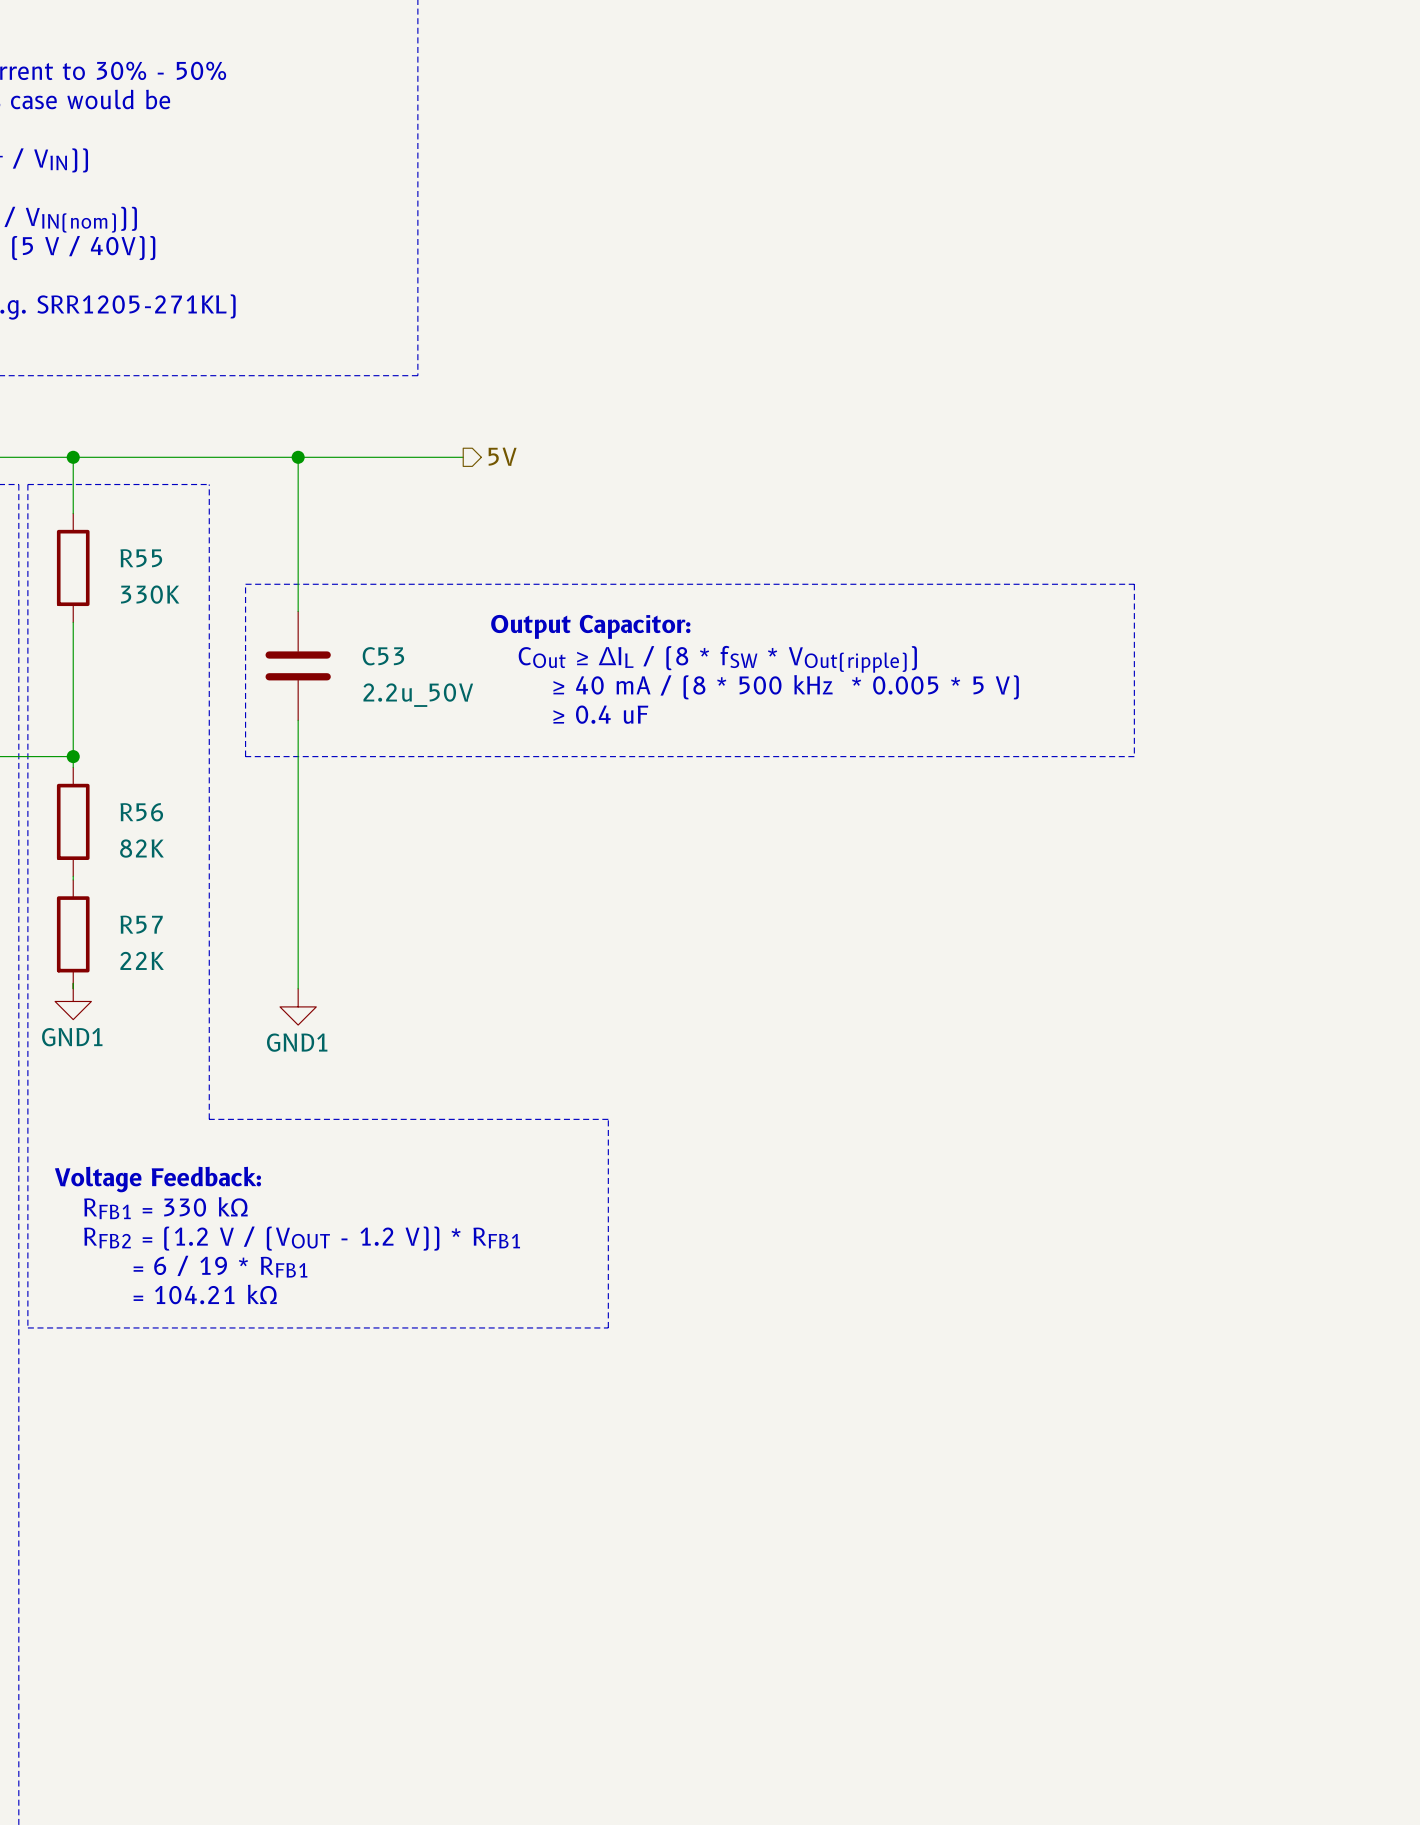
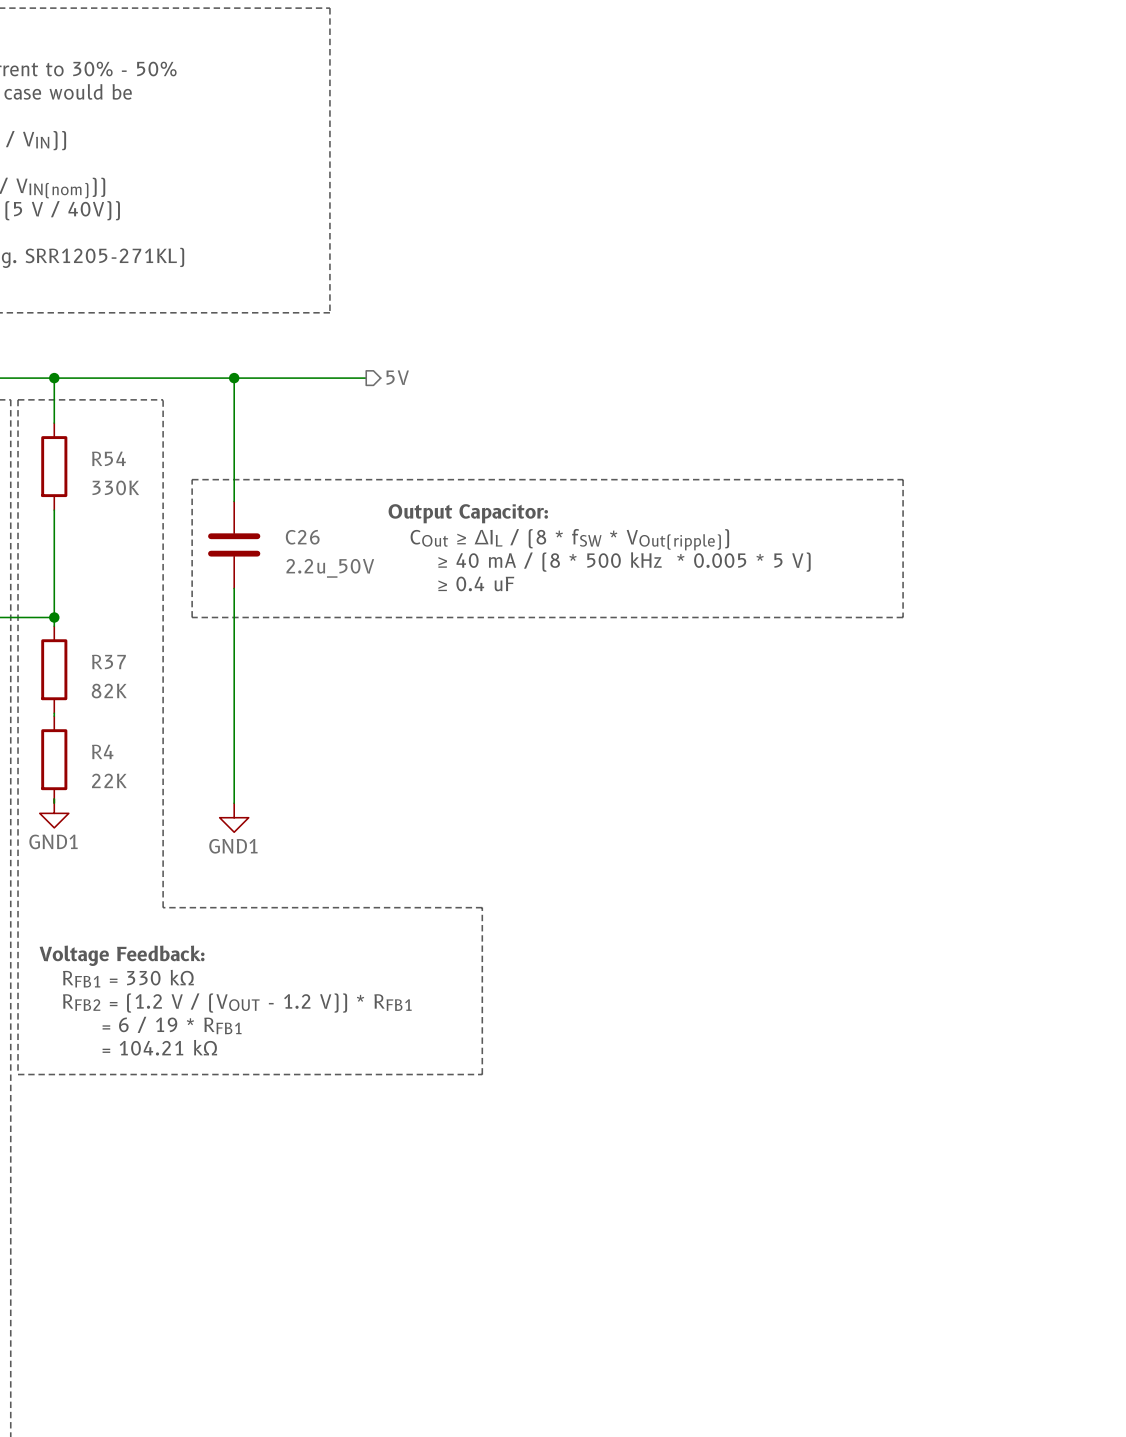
R55 name: R55 (141, 558) -> R54 (108, 458)
C53 name: C53 (383, 656) -> C26 (302, 537)
R56 name: R56 (141, 812) -> R37 (108, 661)
R57 name: R57 (141, 924) -> R4 (102, 751)

